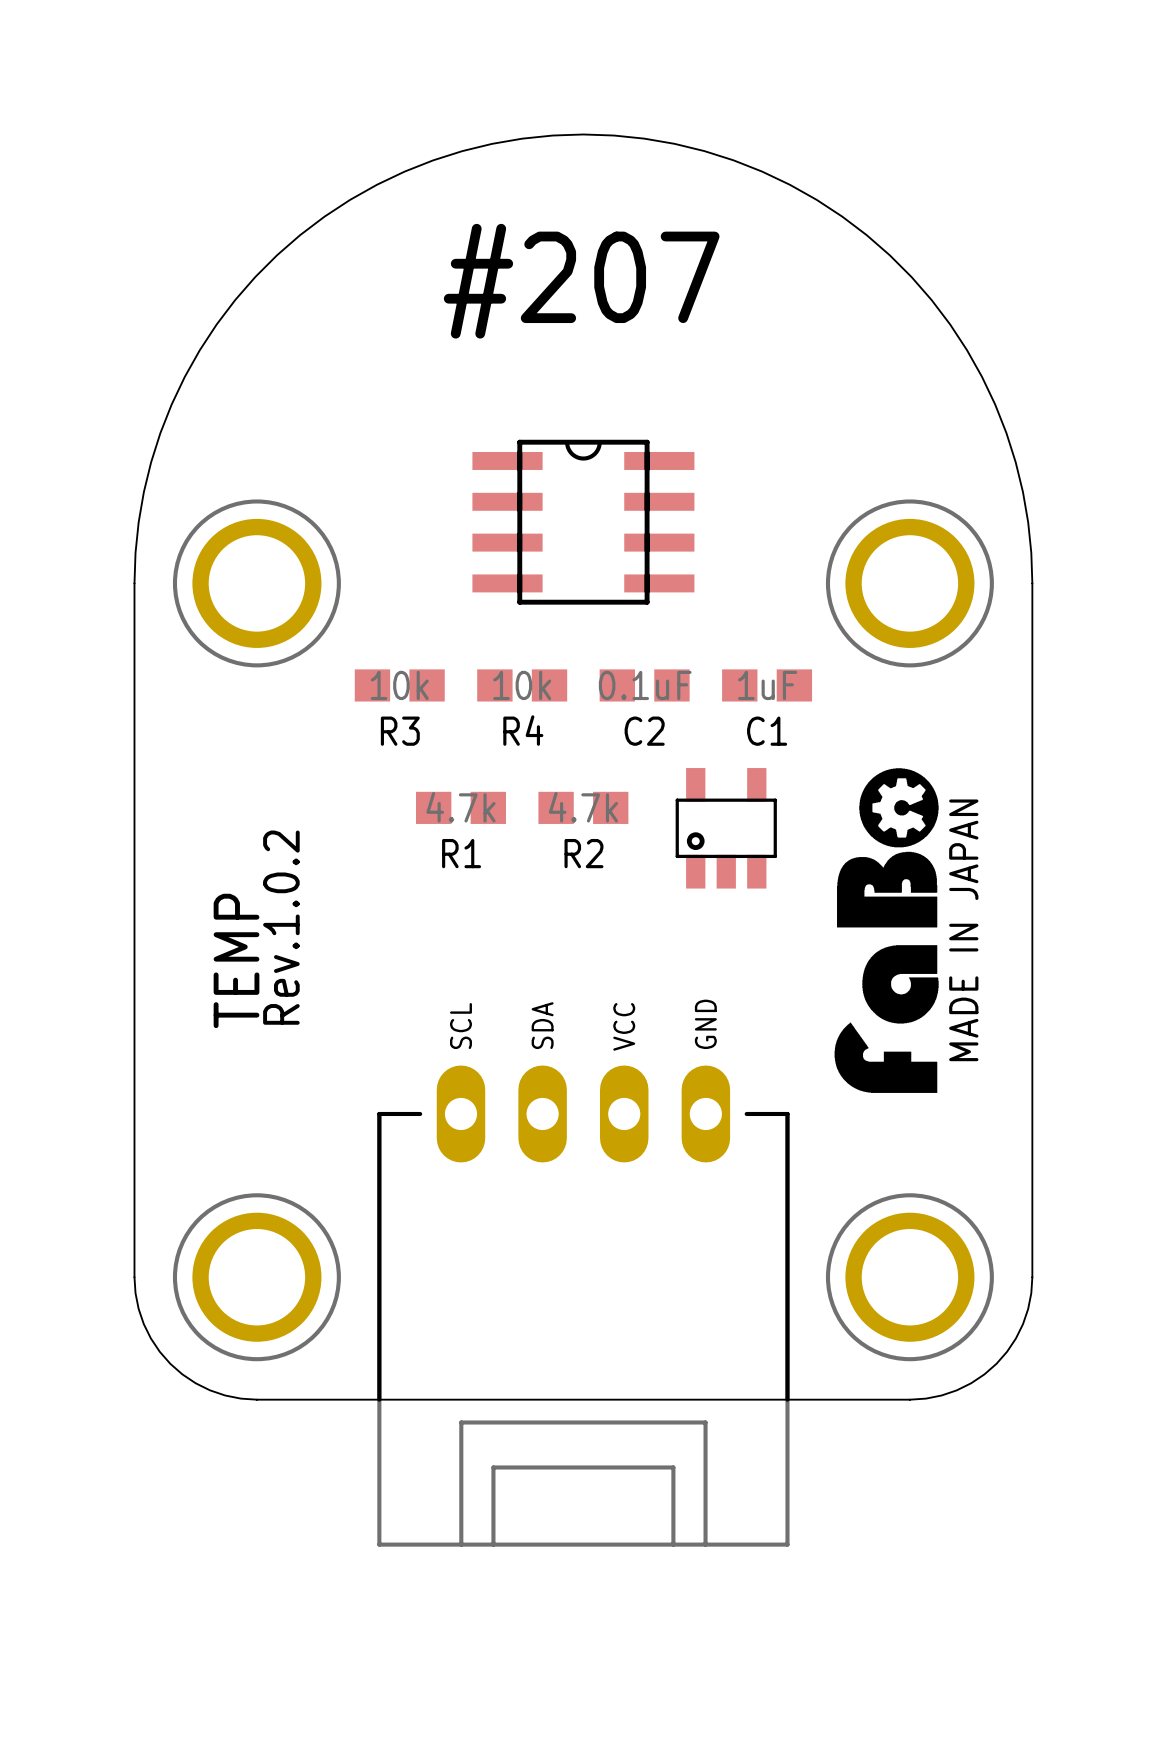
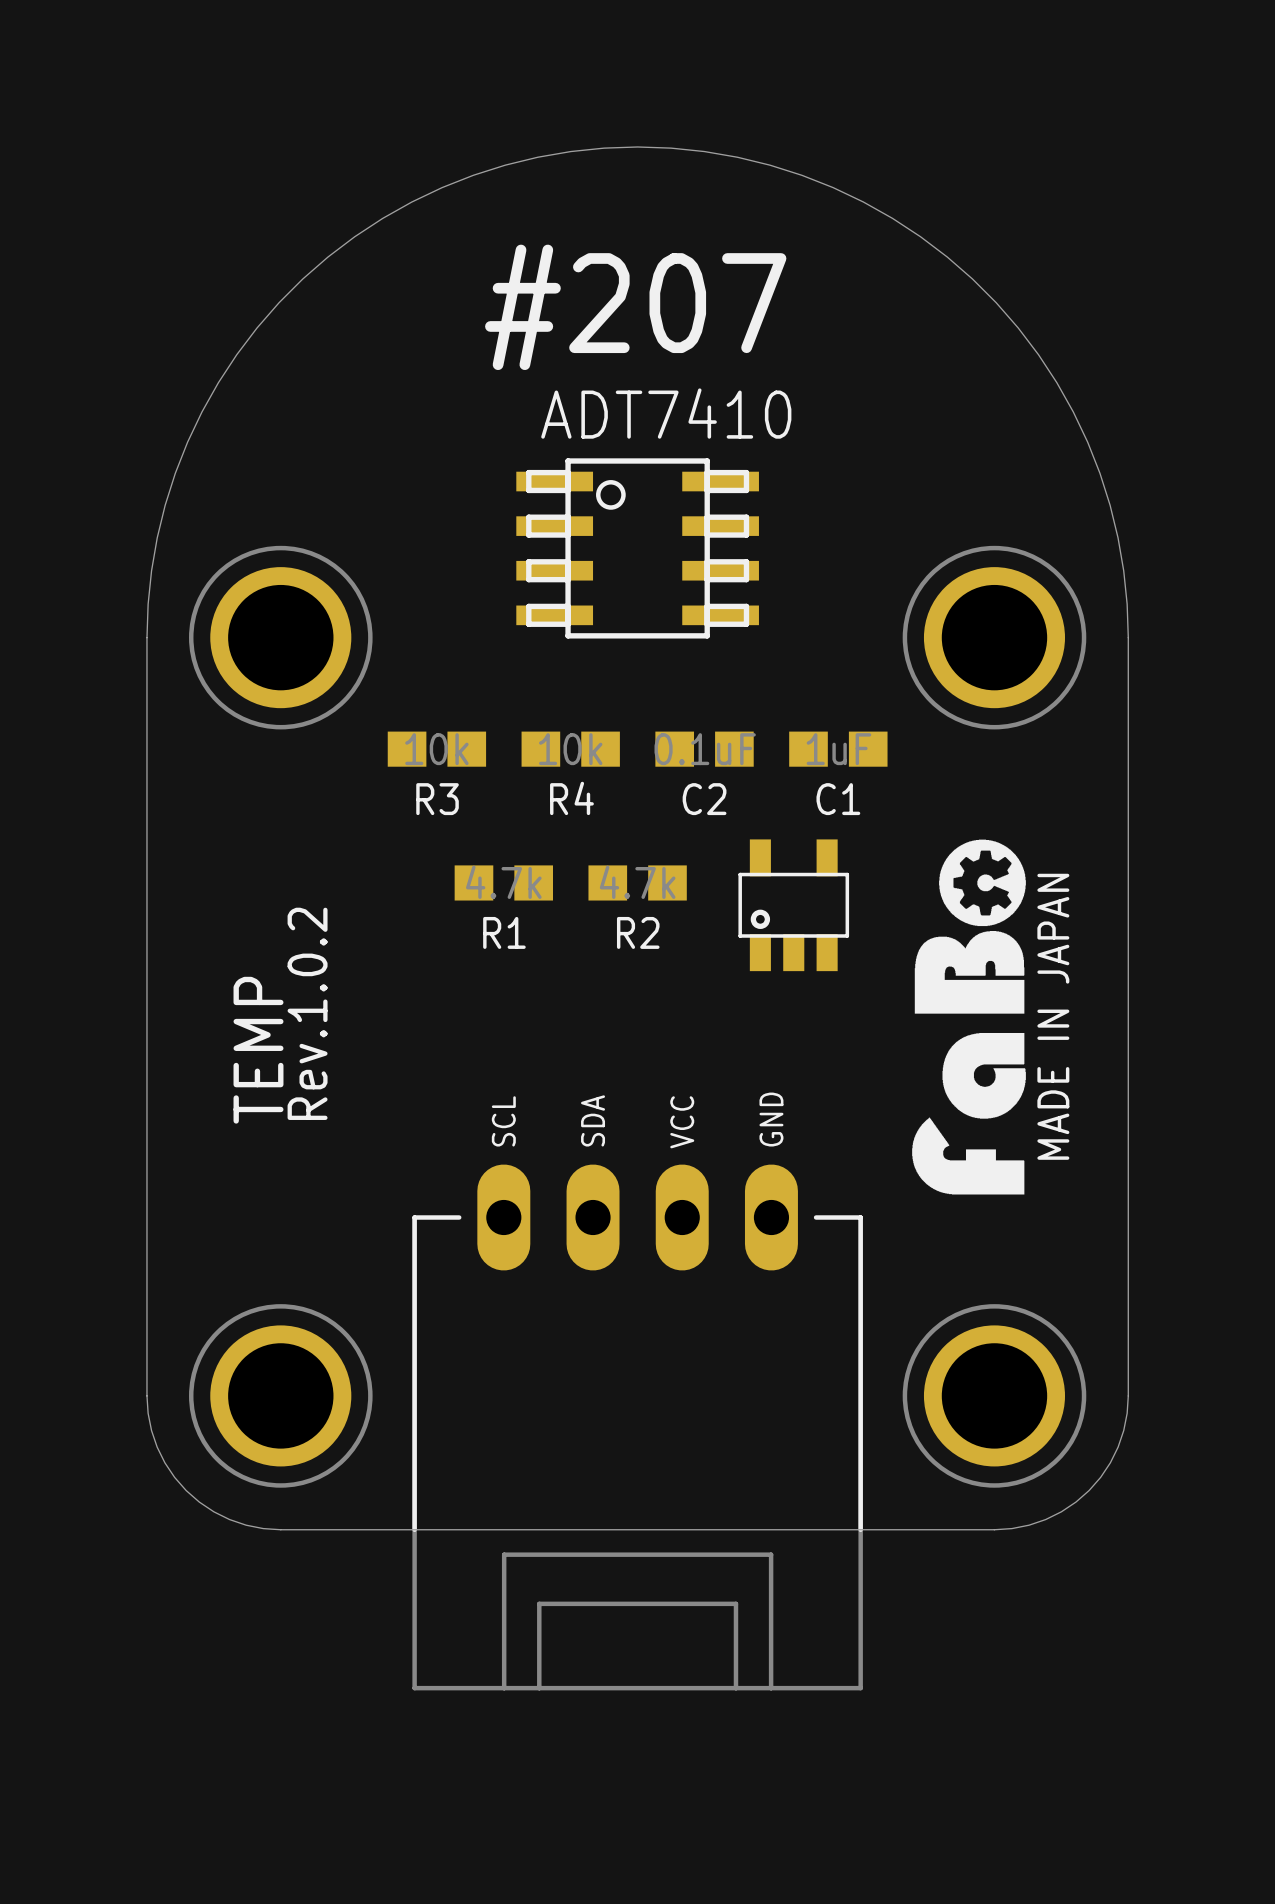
ADT7410: none -> (637, 548)
part: (583, 522) -> none

